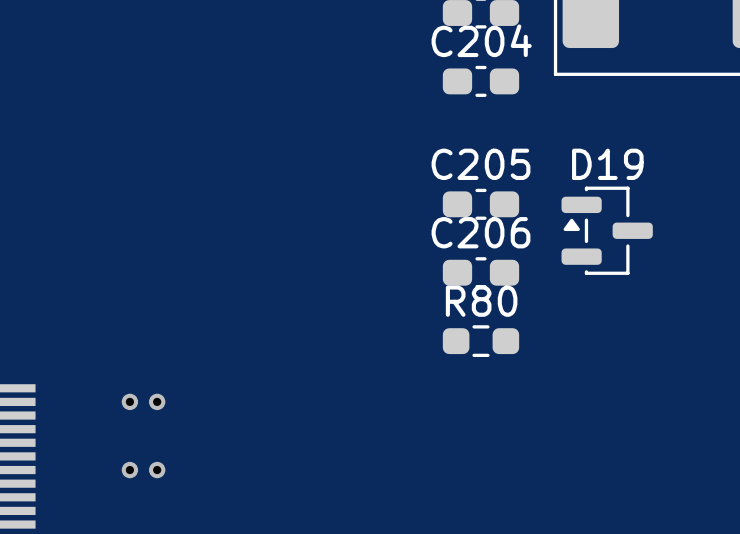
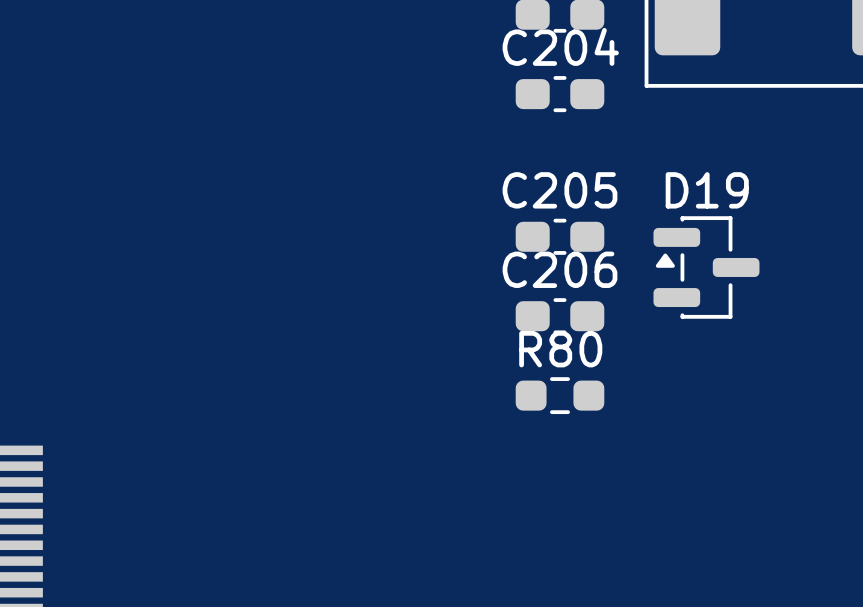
via: (129, 401) -> none
via: (157, 401) -> none
via: (129, 470) -> none
via: (157, 470) -> none

